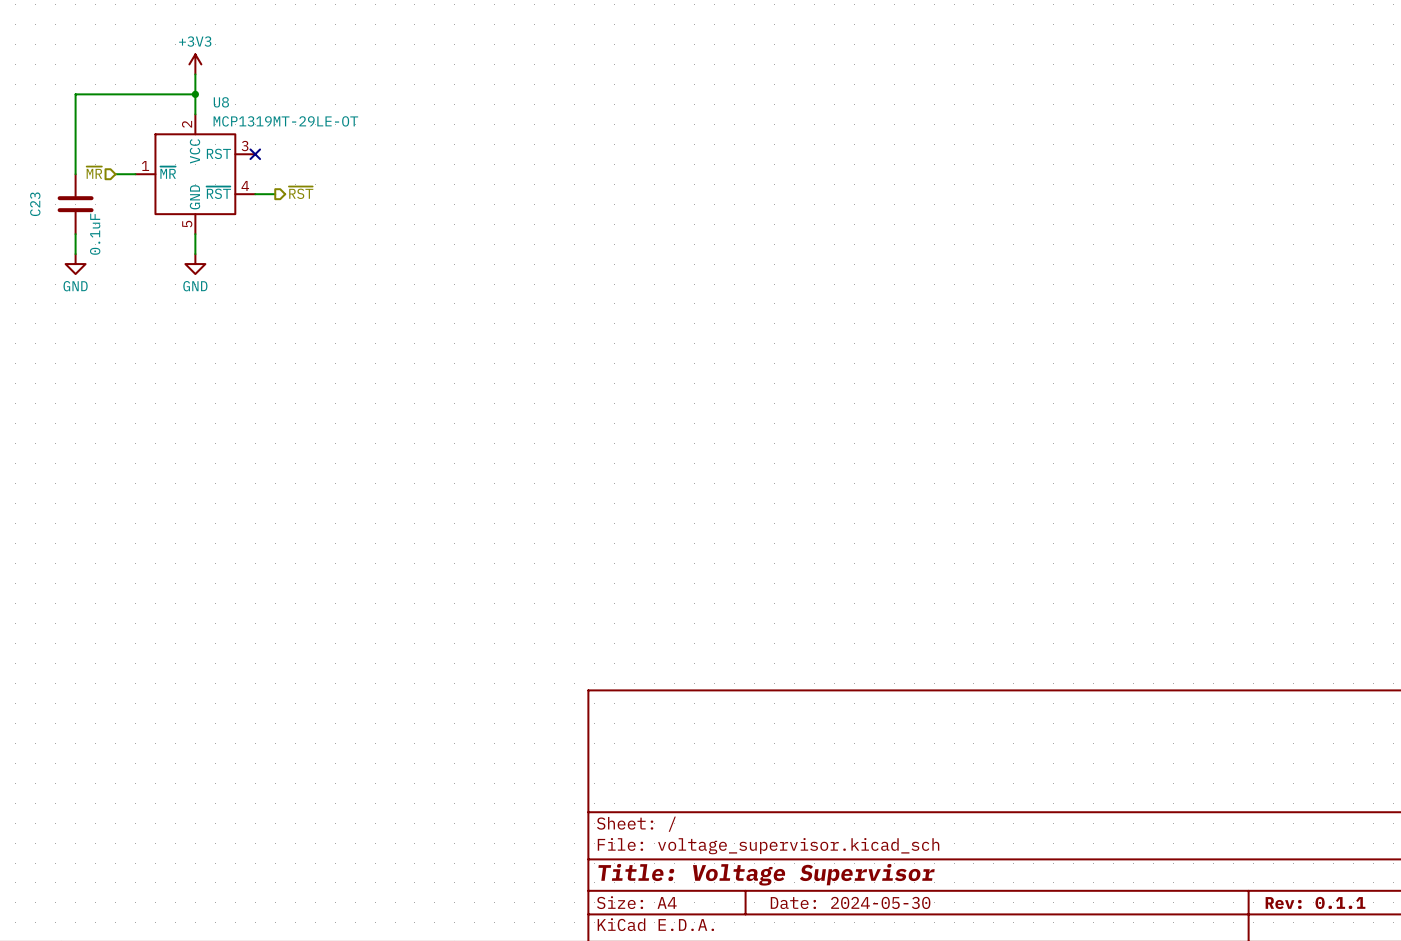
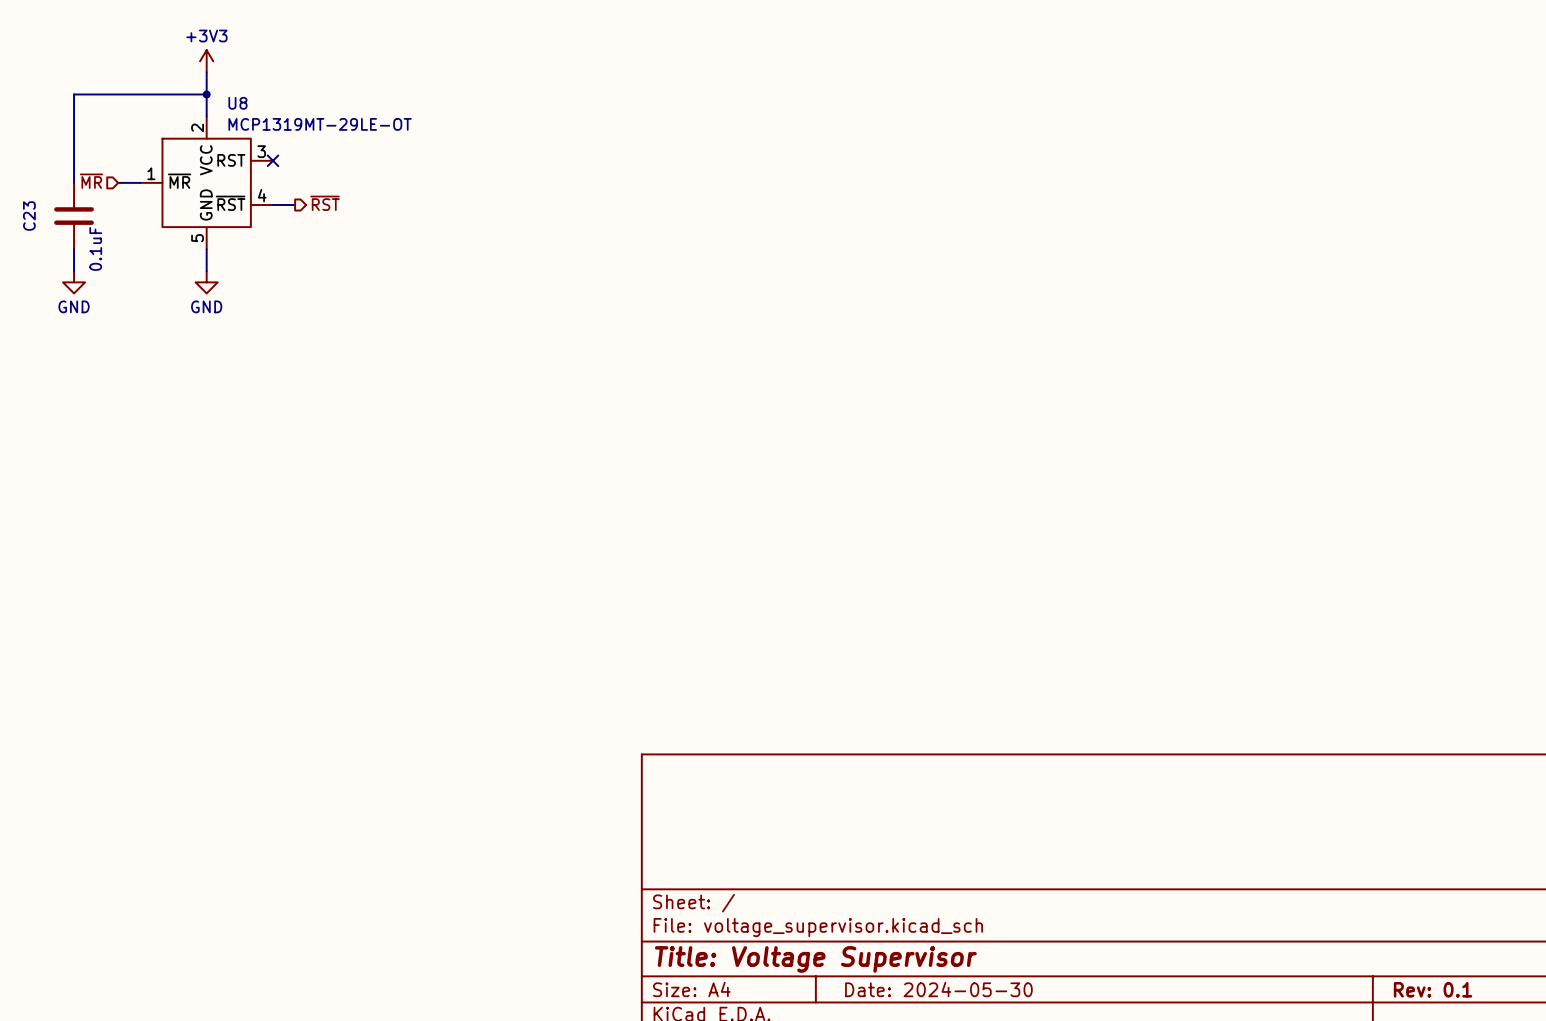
title block: Rev: 0.1.1 (1315, 902) -> Rev: 0.1 (1433, 989)

